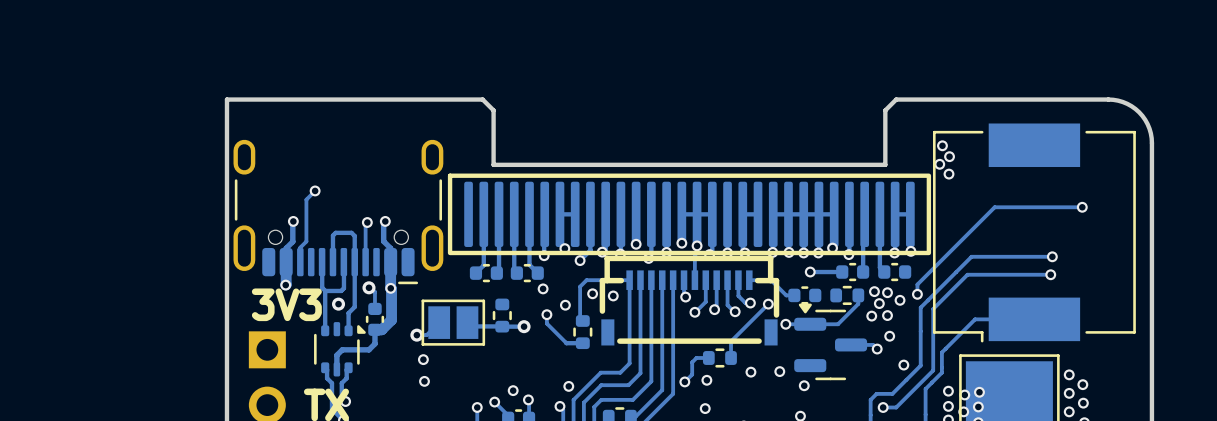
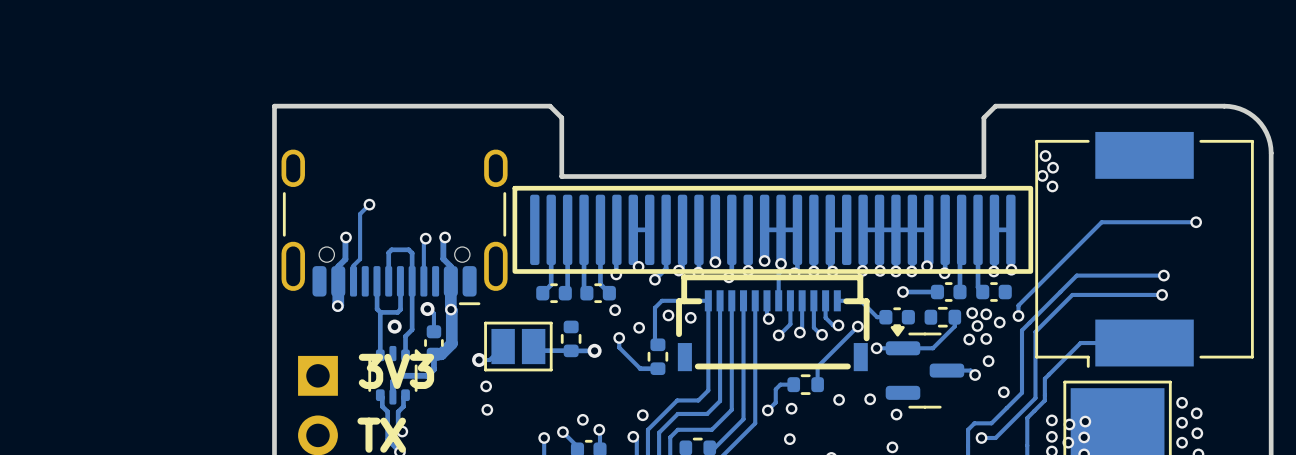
text position: 3V3 (286, 304) -> 3V3 (396, 371)

